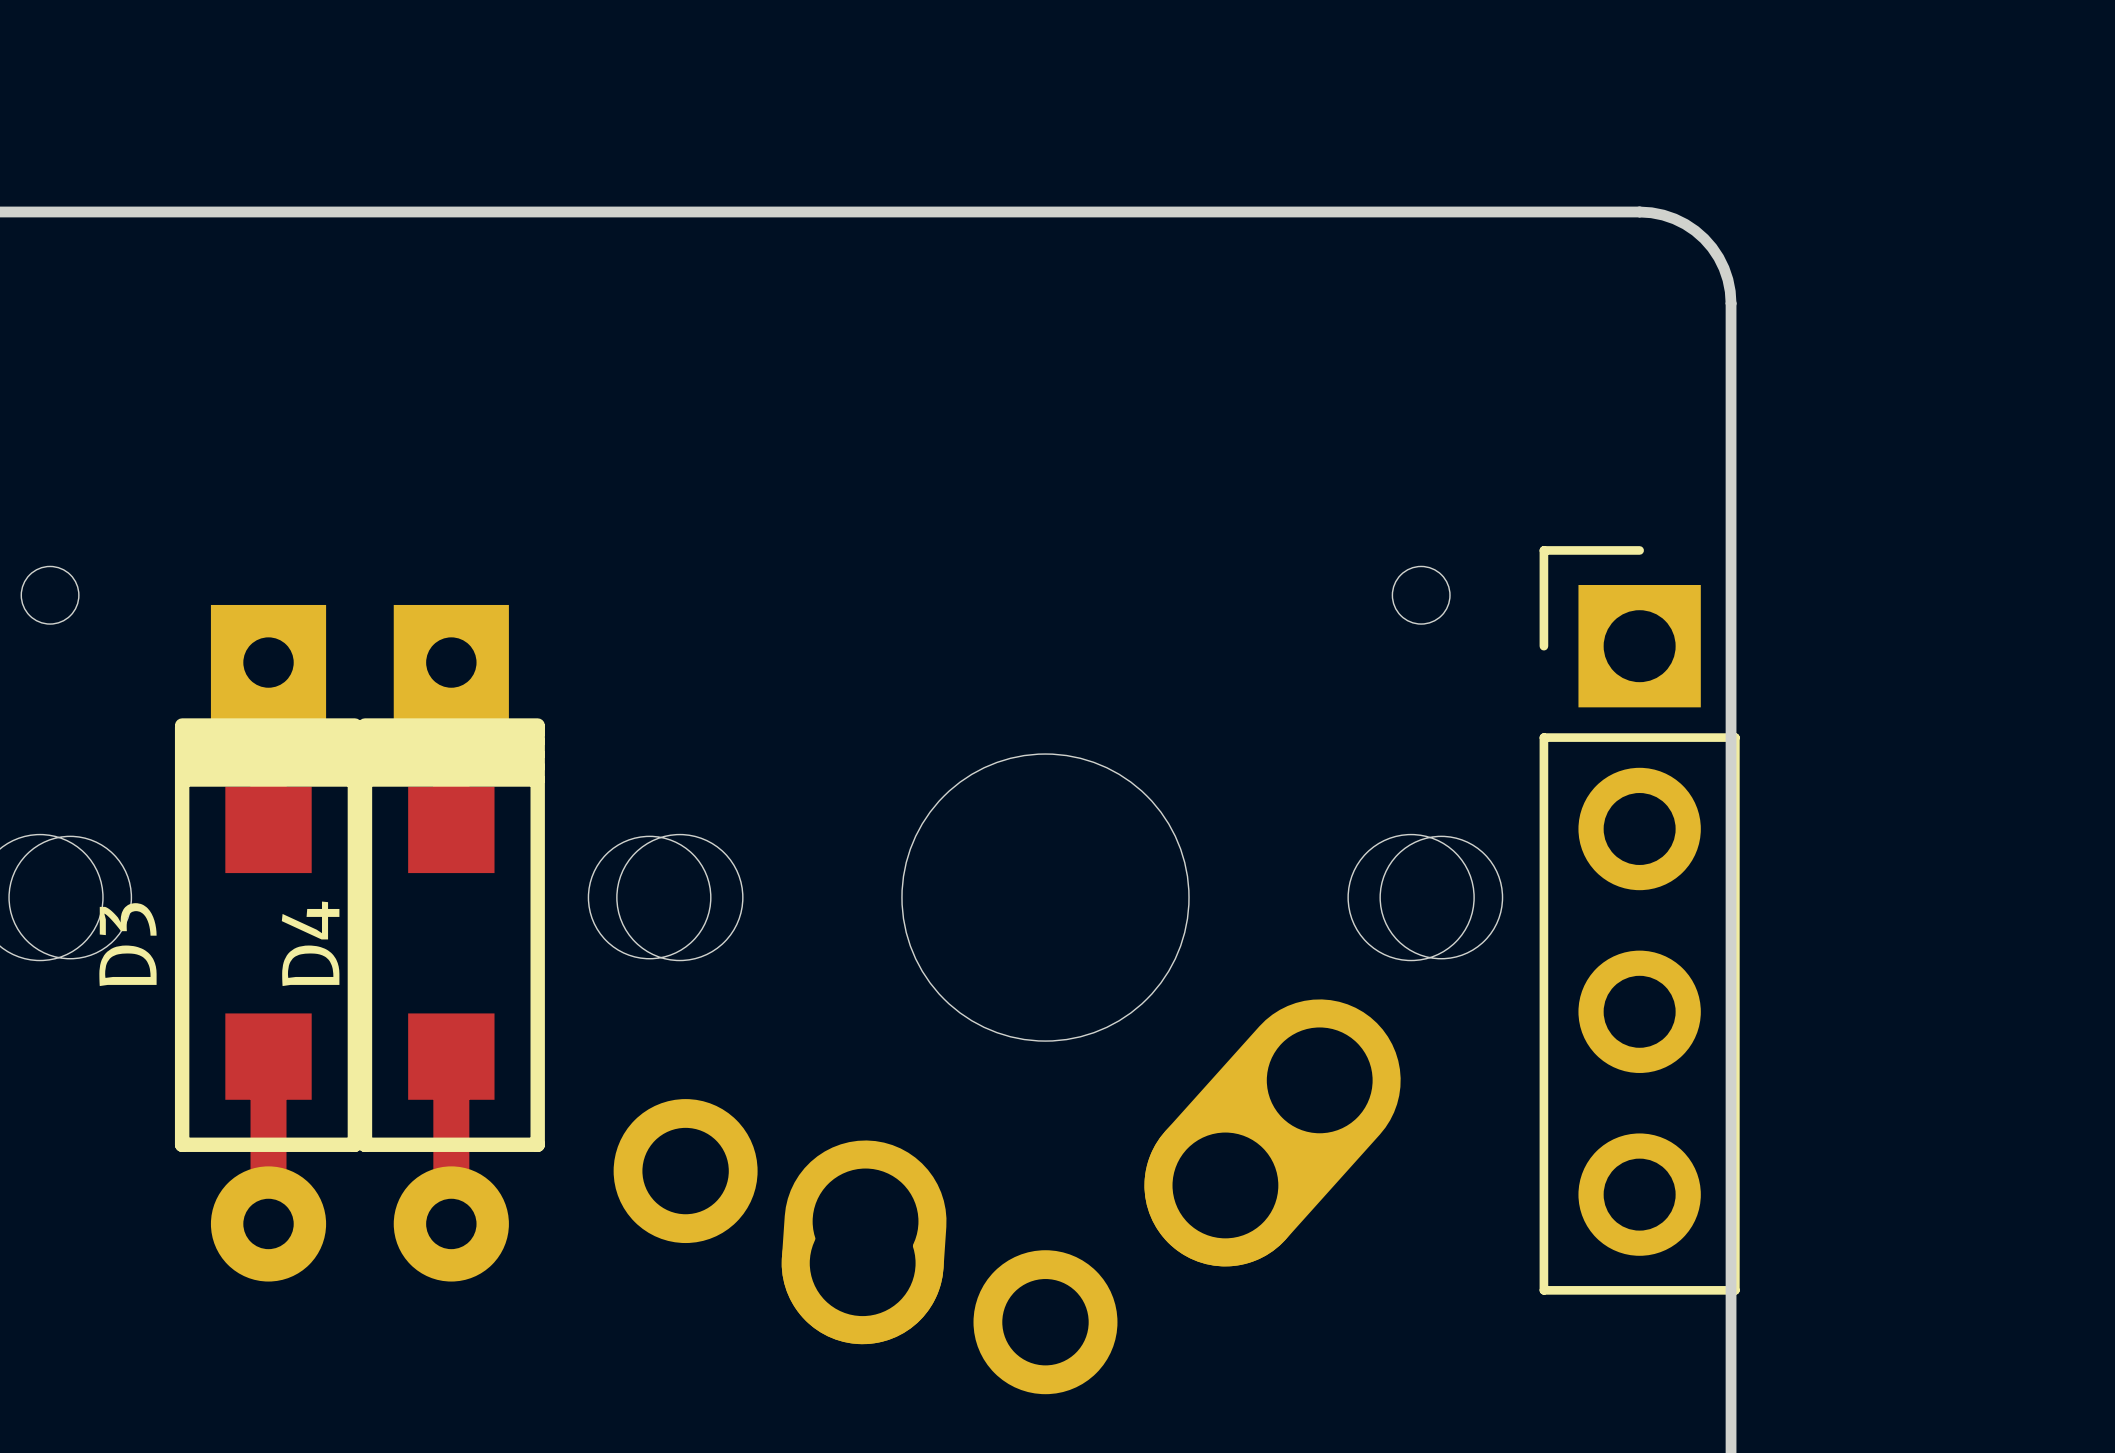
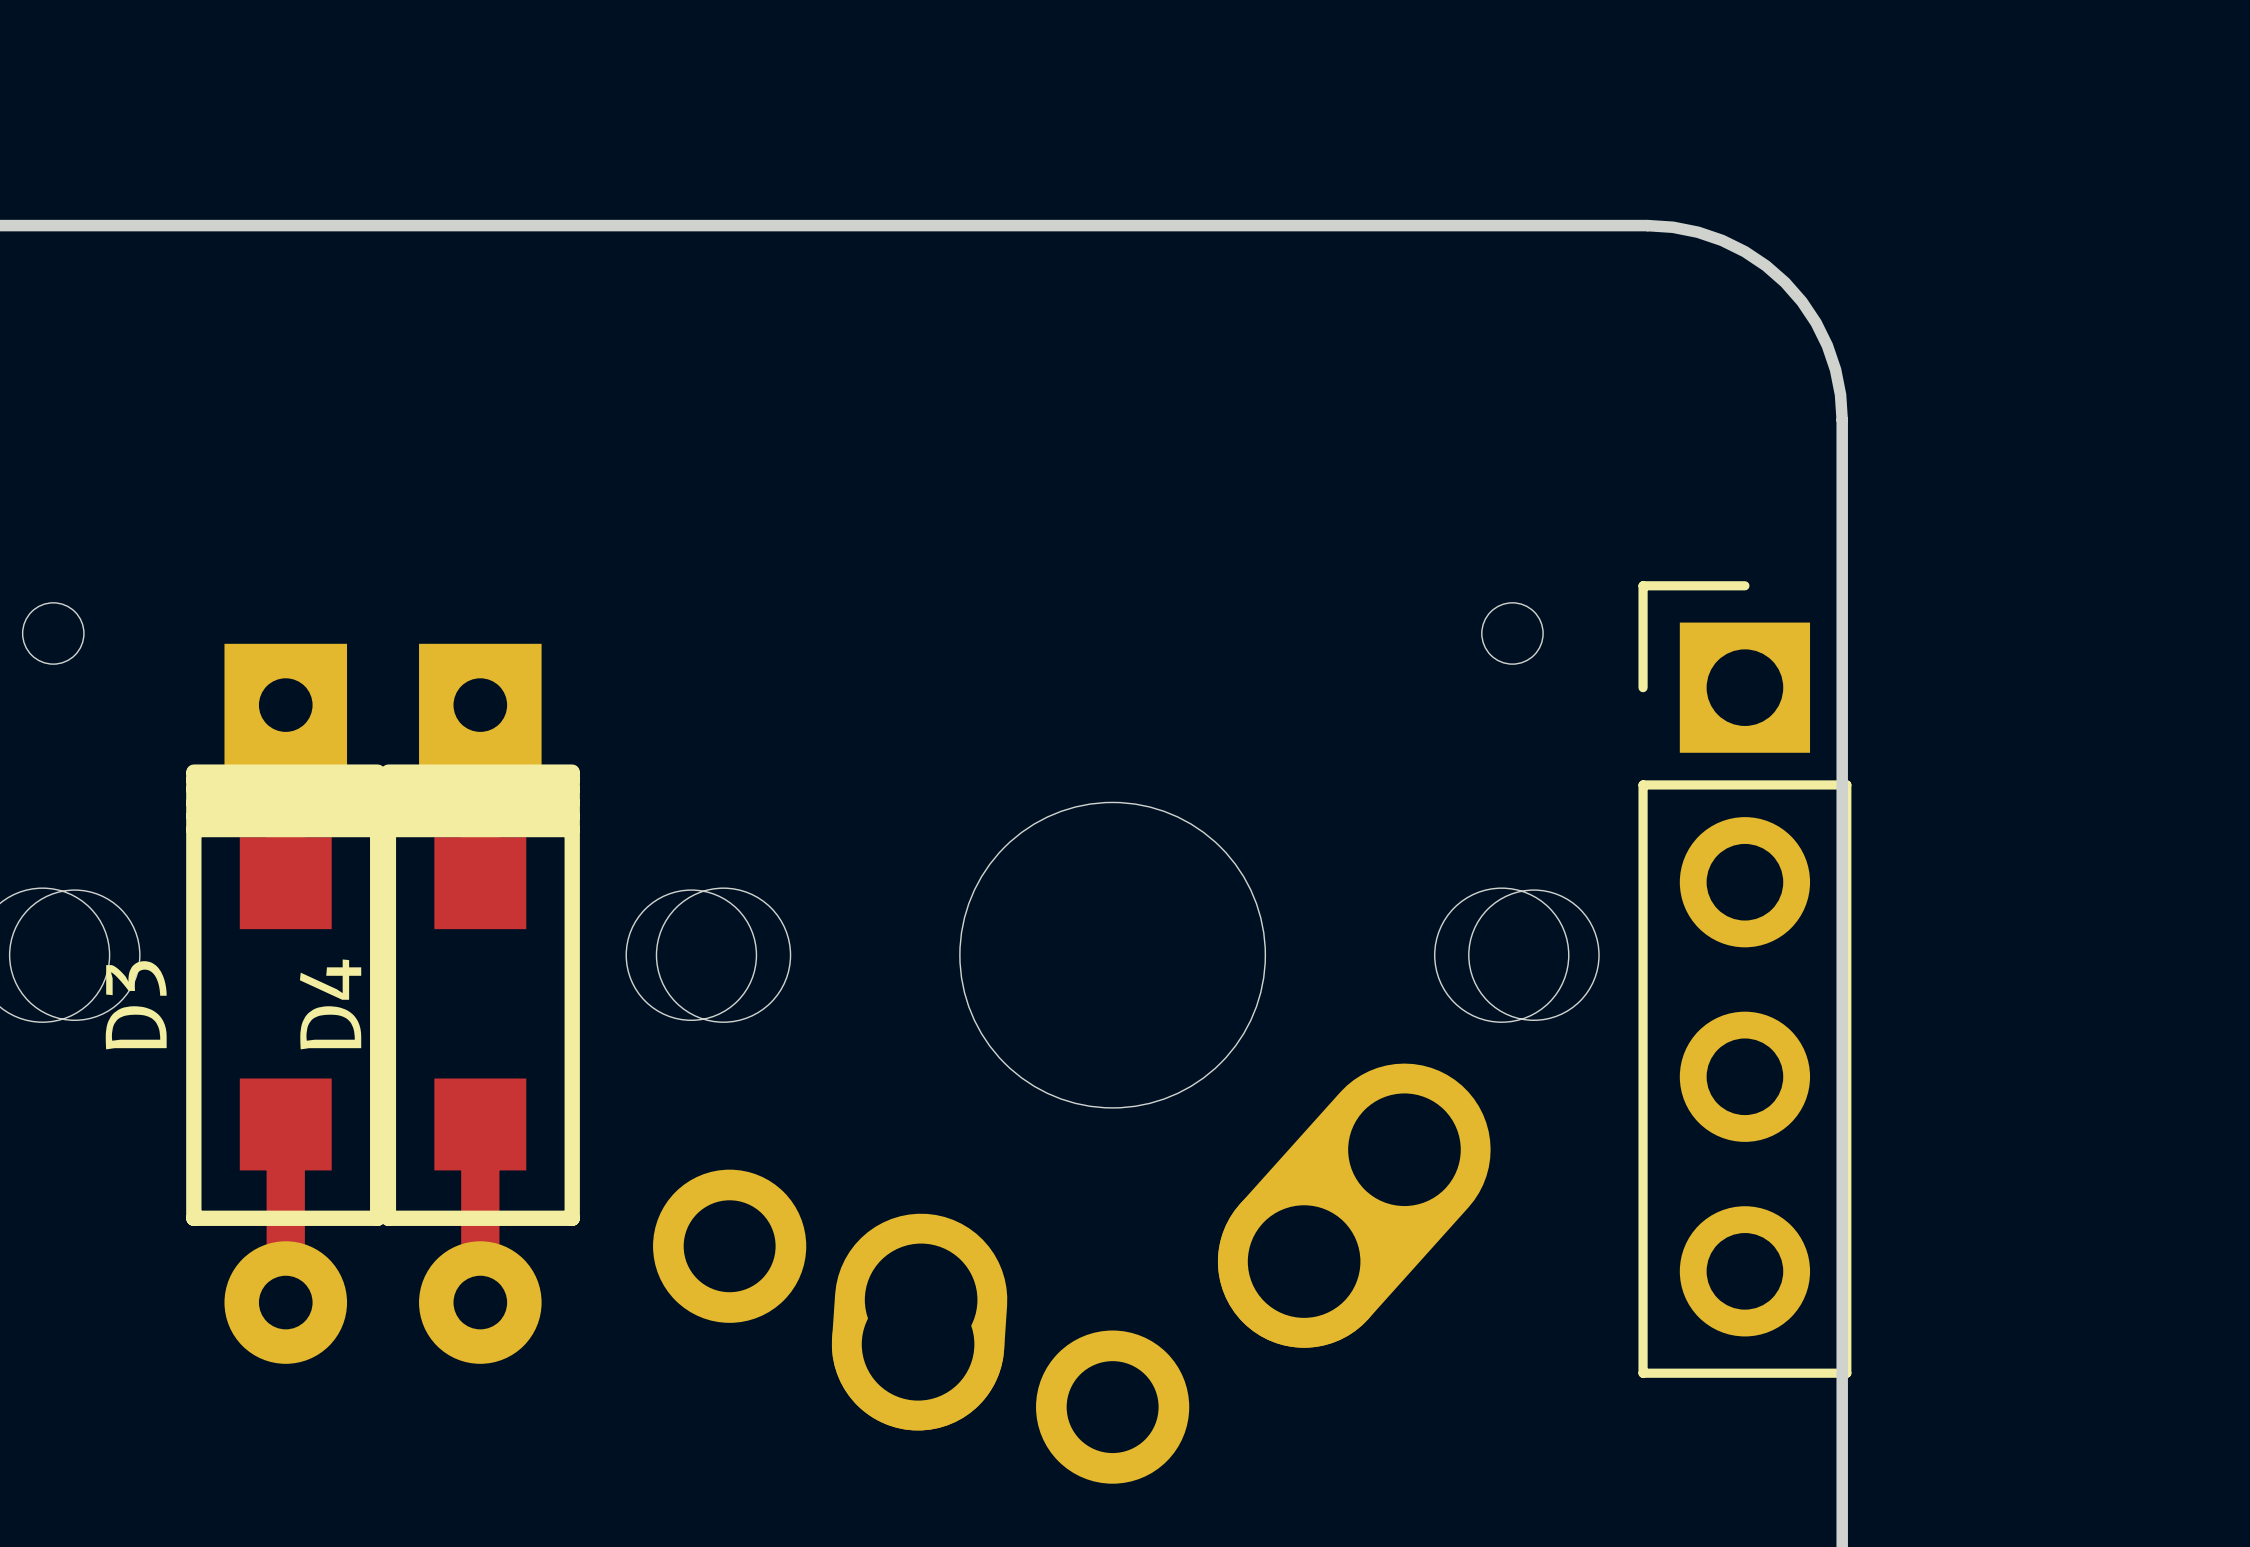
board edge: (1548, 211) (1651, 212) (1663, 215) (1685, 224) (1704, 238) (1718, 257) (1724, 268) (1730, 291) (1731, 394) -> (1647, 225) (1673, 227) (1698, 232) (1722, 240) (1744, 251) (1766, 265) (1785, 282) (1802, 301) (1816, 322) (1827, 345) (1835, 369) (1840, 394) (1842, 420)

